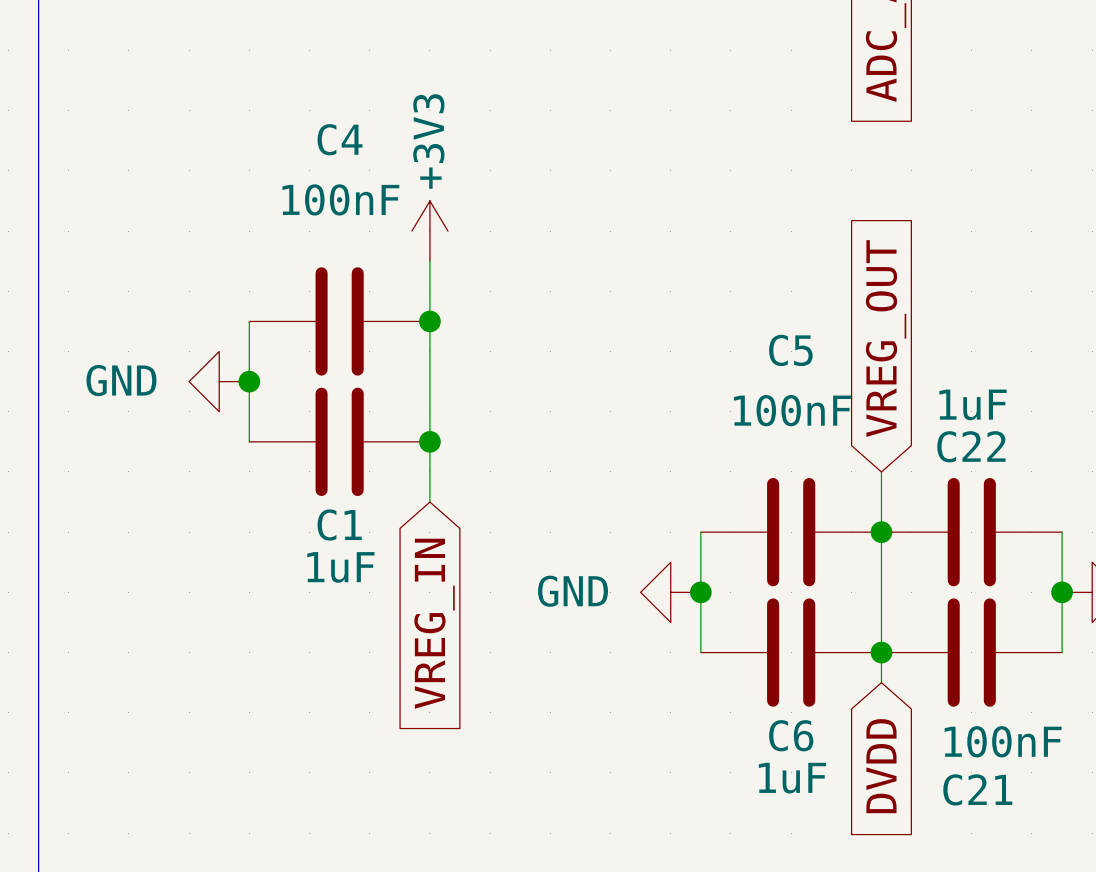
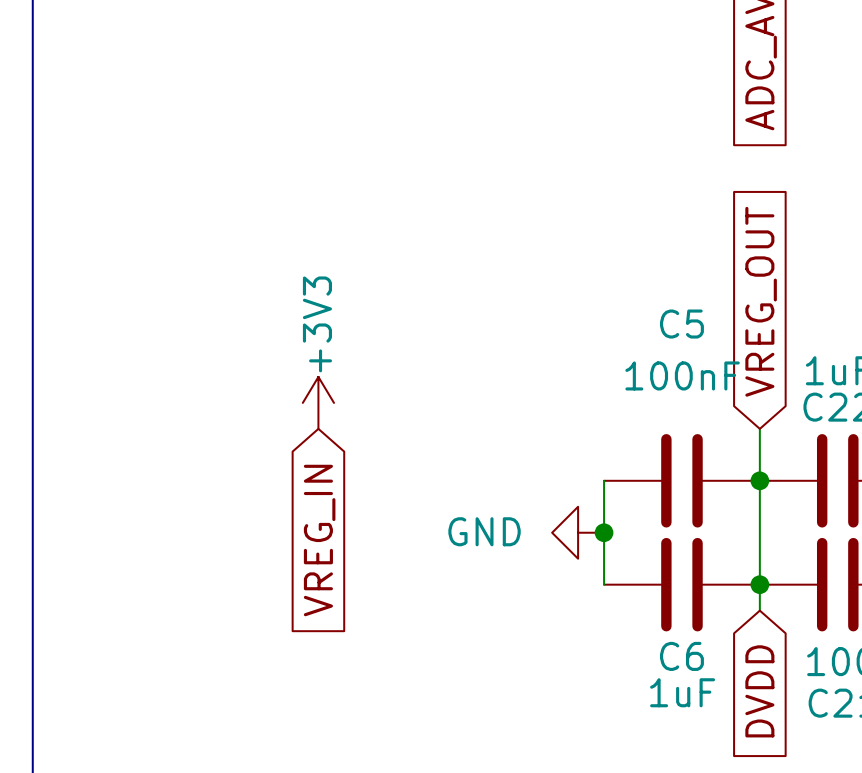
power symbol position: +3V3 (429, 231) -> +3V3 (318, 402)
wire: (429, 261) (429, 502) -> none
wire: (249, 321) (249, 441) -> none
C4: 100nF (339, 321) -> none
junction: (429, 321) -> none
power symbol: GND (219, 381) -> none
junction: (249, 381) -> none
C1: 1uF (339, 441) -> none
junction: (429, 441) -> none
global label position: VREG_IN (434, 623) -> VREG_IN (319, 540)

